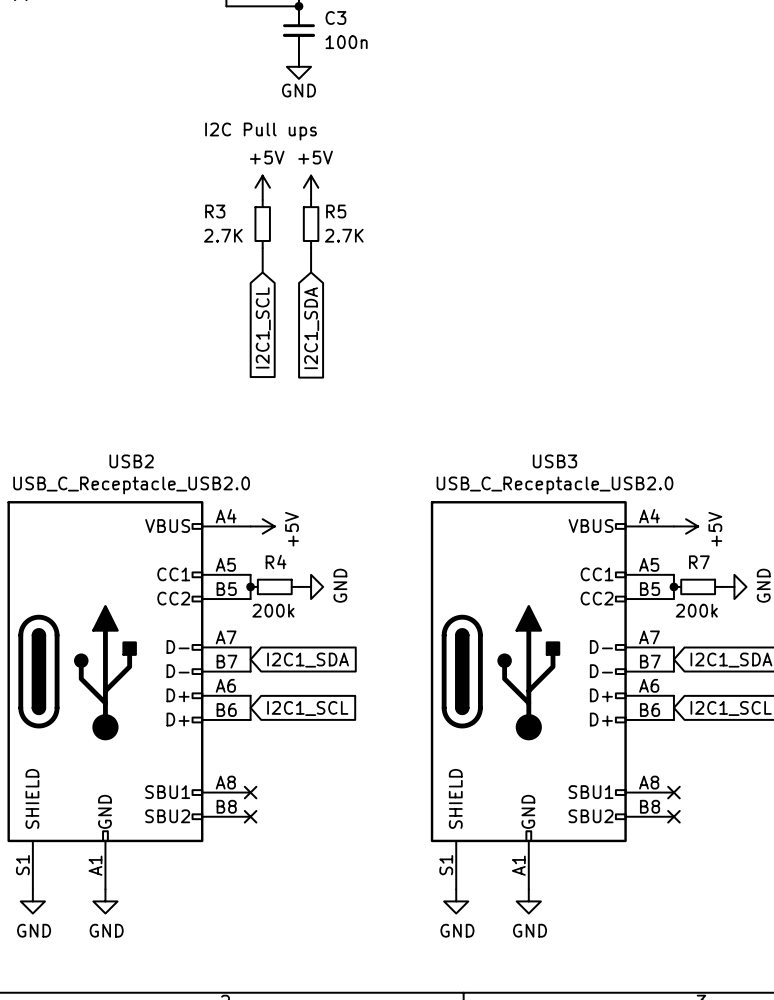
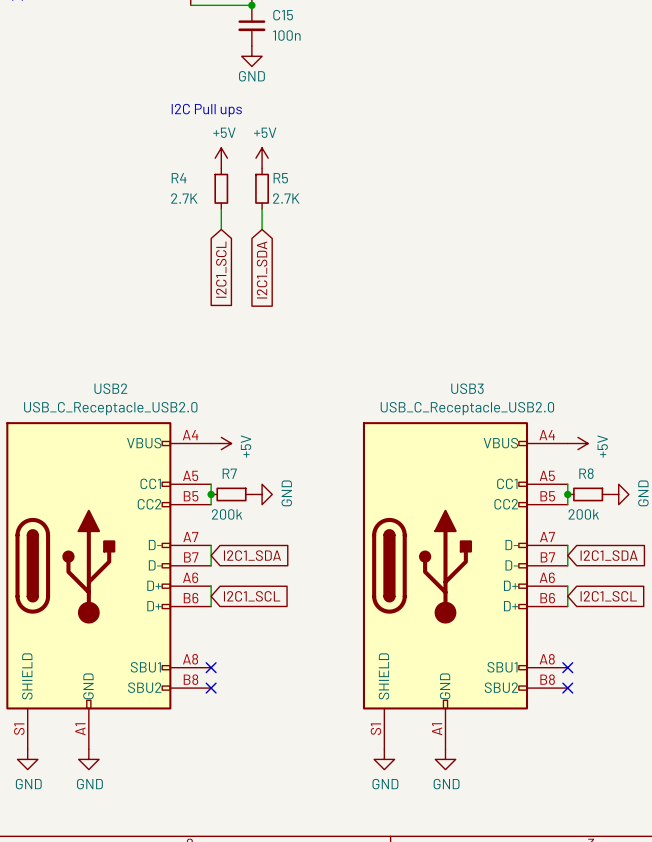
C3 name: C3 (335, 17) -> C15 (283, 15)
R3 name: R3 (215, 211) -> R4 (179, 178)
R4 name: R4 (276, 562) -> R7 (229, 473)
R7 name: R7 (699, 562) -> R8 (586, 473)

